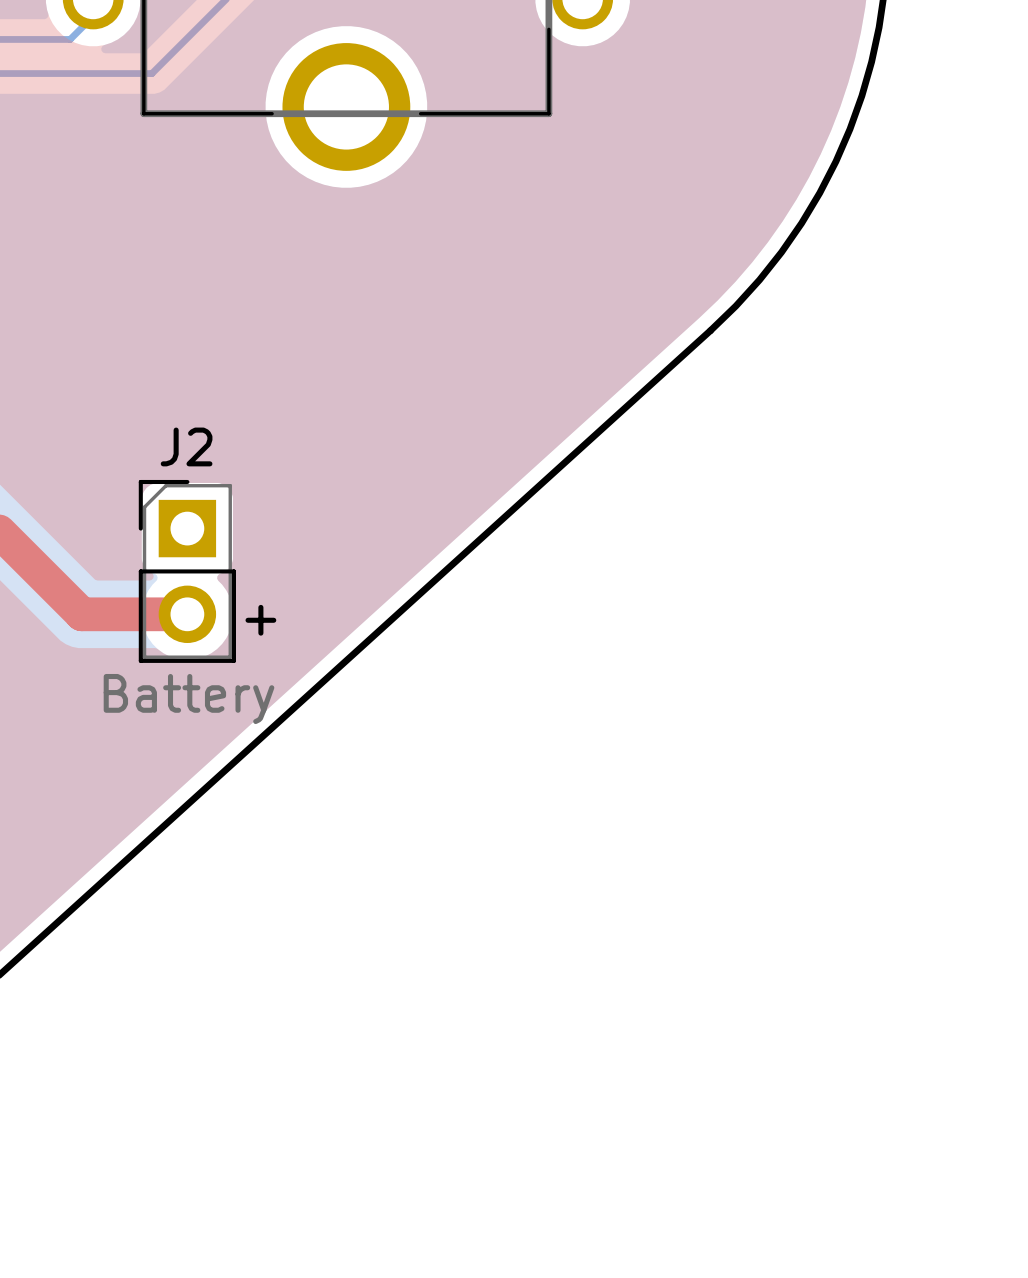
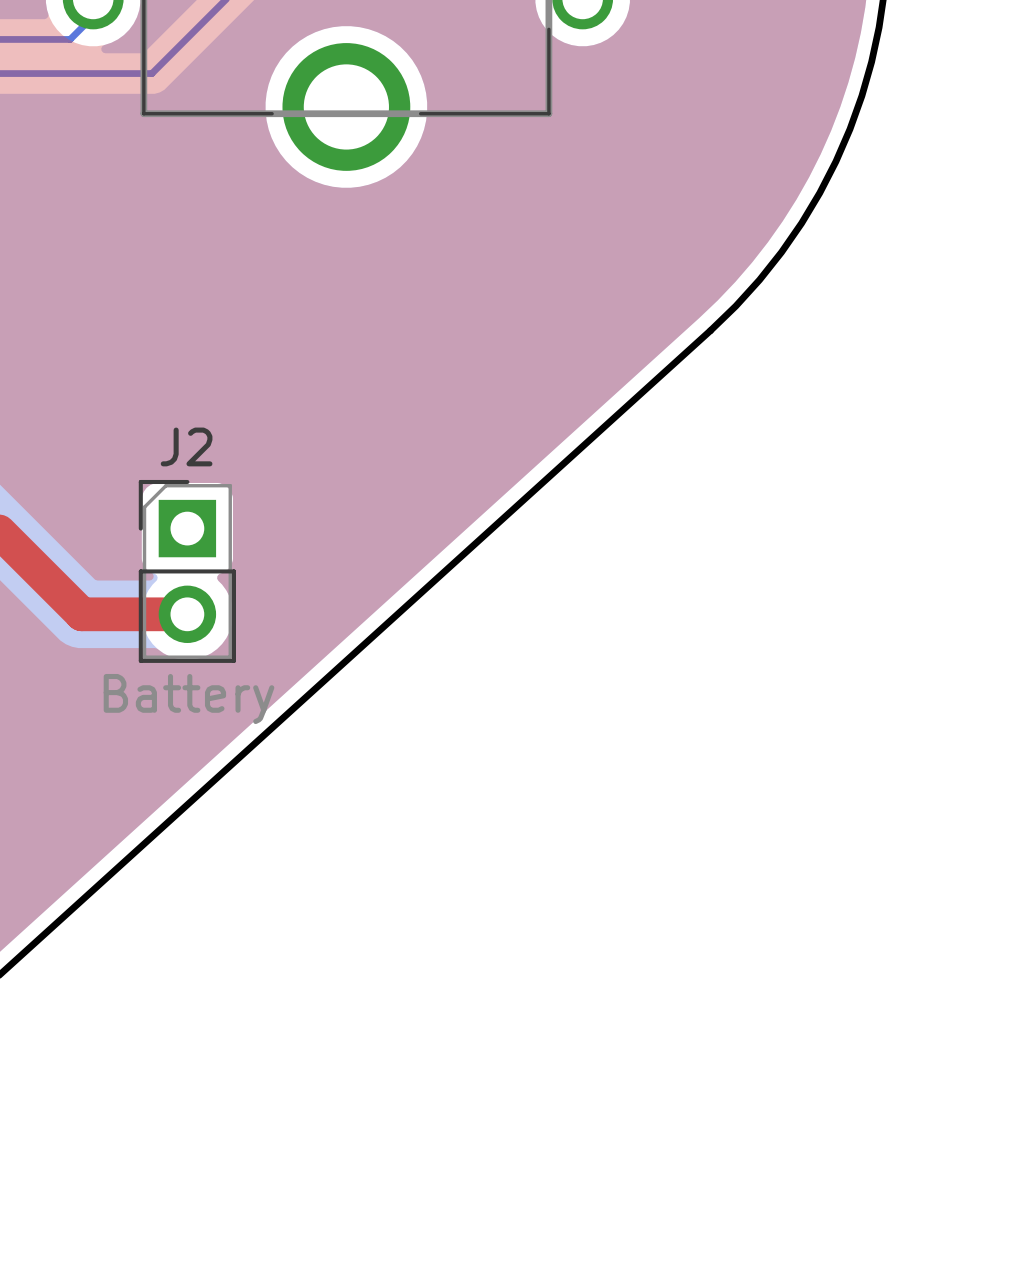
text: + (260, 620) -> none

